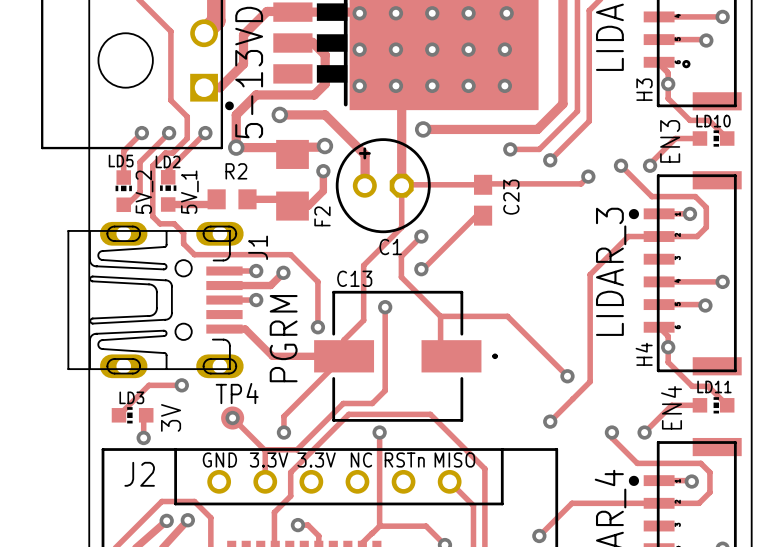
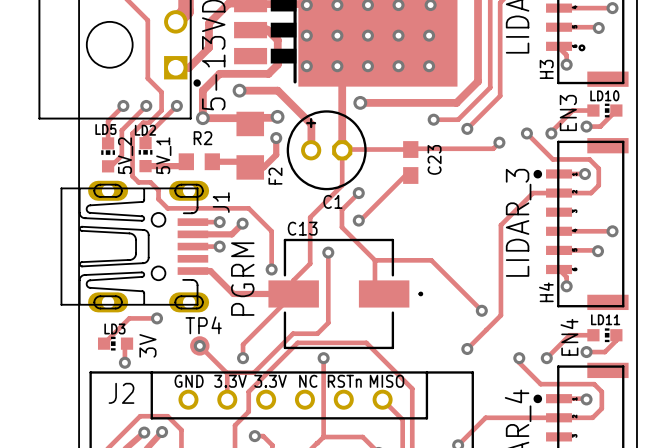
track: (668, 84) (668, 98) (689, 120) (709, 120) (727, 138) -> (586, 126) (600, 126) (616, 110)
via: none -> (586, 126)
track: (668, 347) (668, 362) (692, 386) (709, 386) (727, 405) -> (586, 352) (604, 352) (616, 340) (616, 335)
via: none -> (586, 352)

